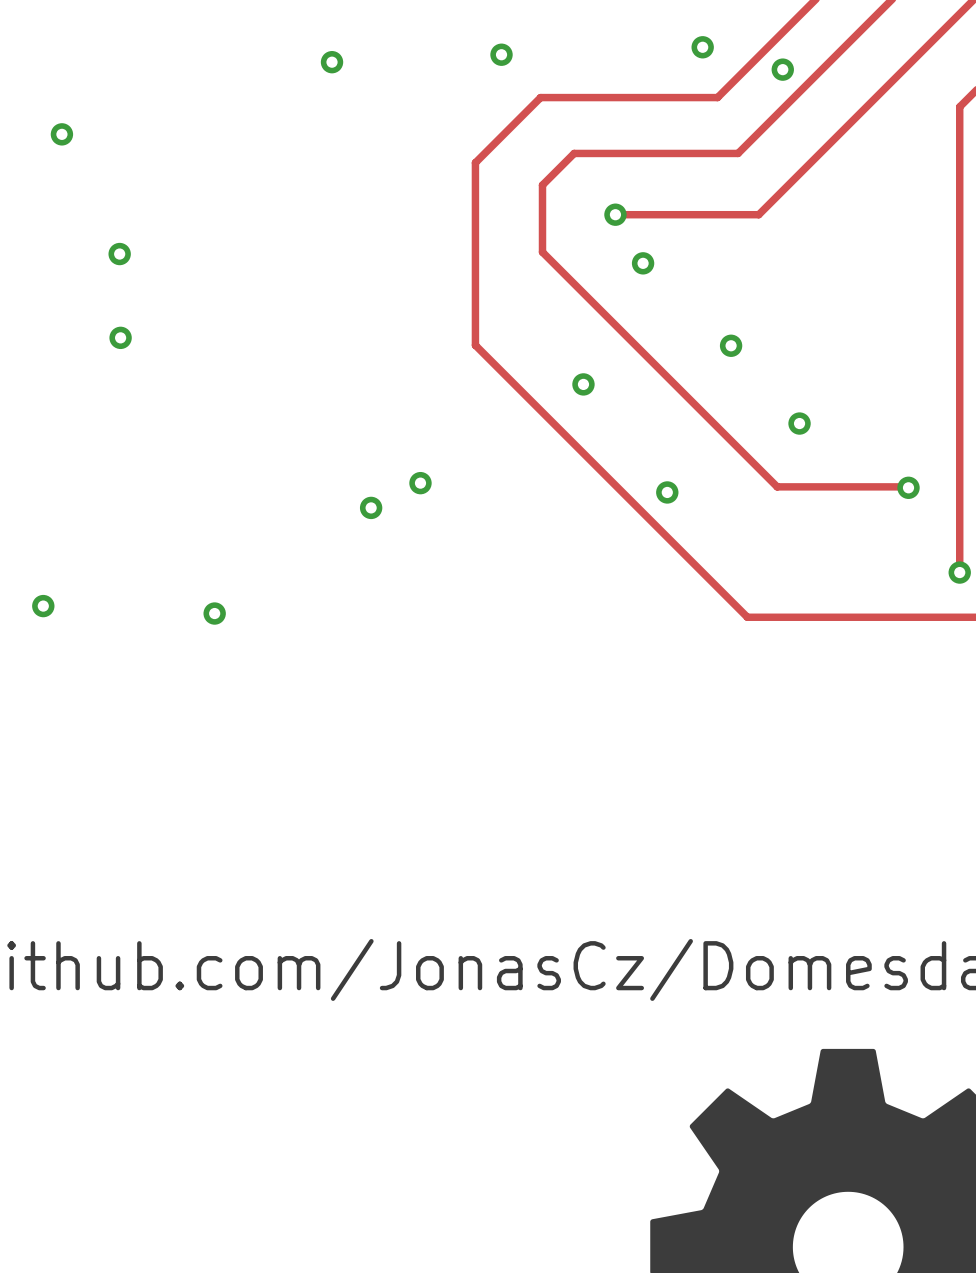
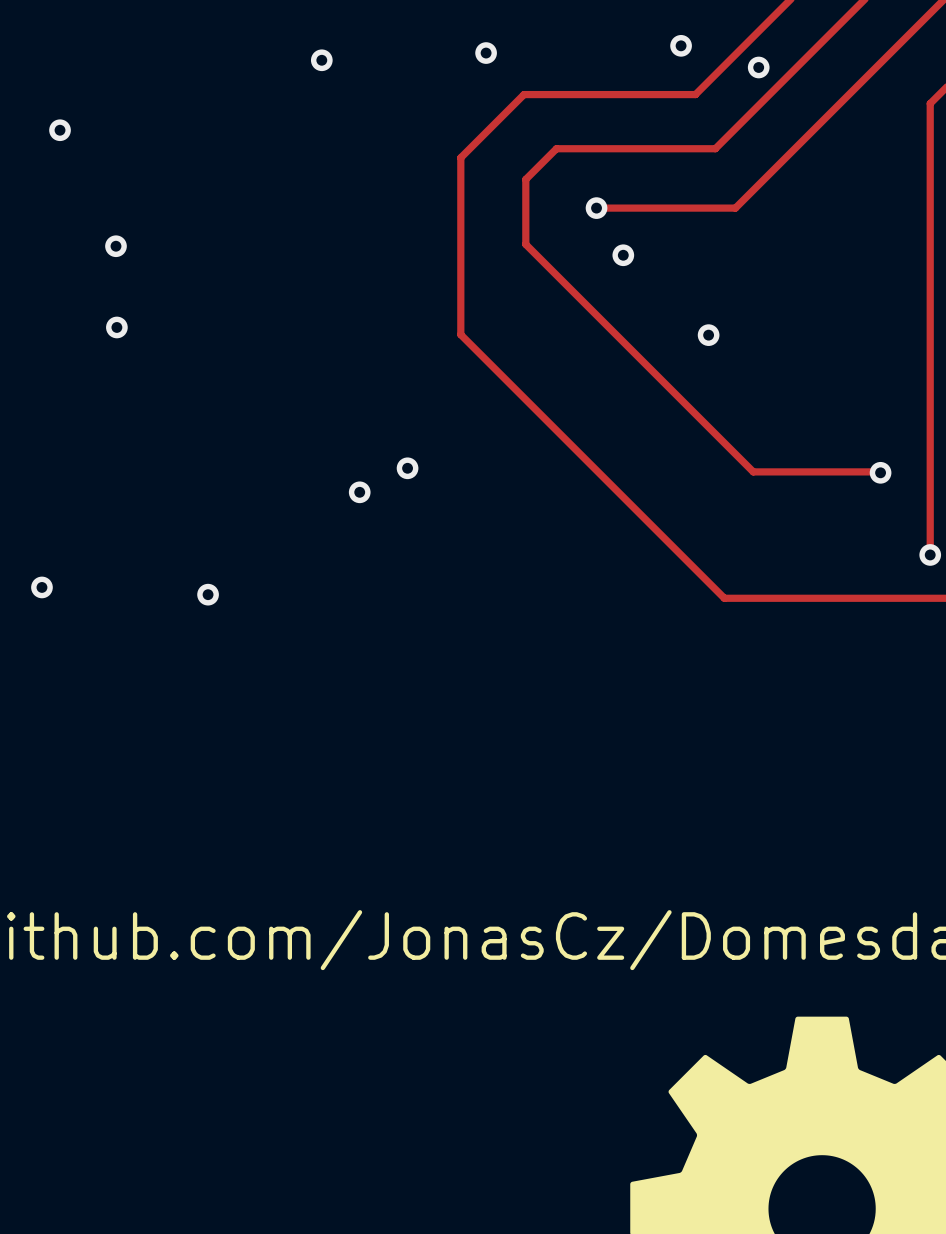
via: (583, 384) -> none
via: (799, 423) -> none
via: (667, 492) -> none

